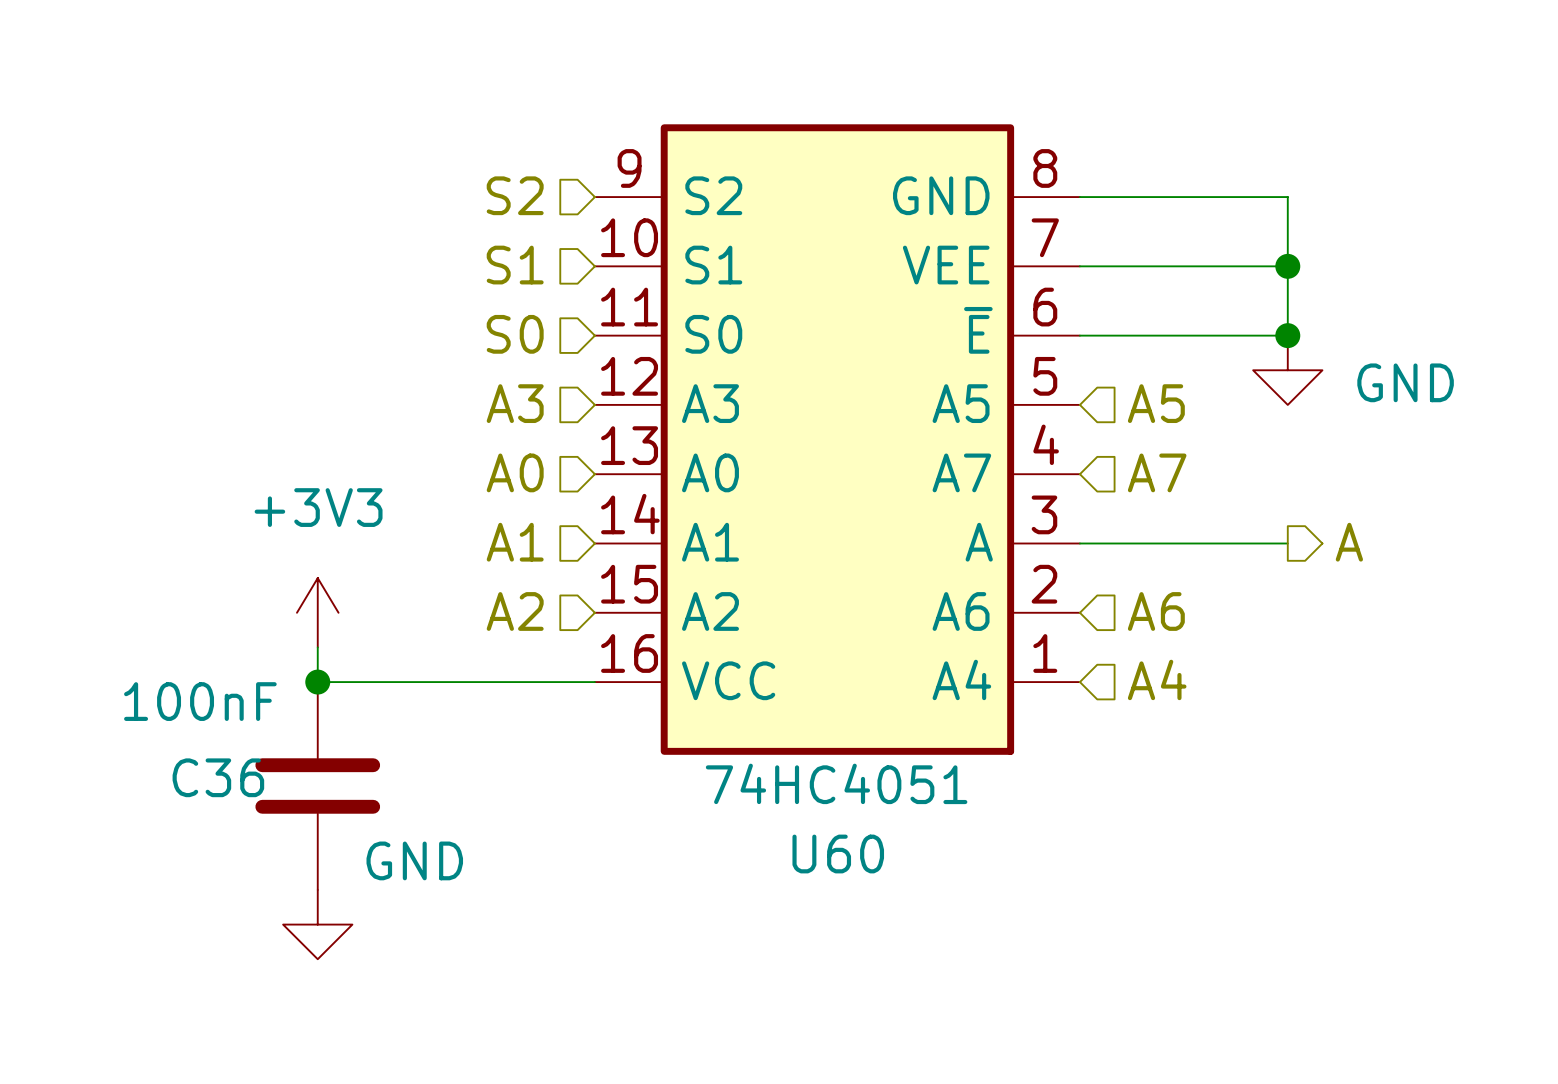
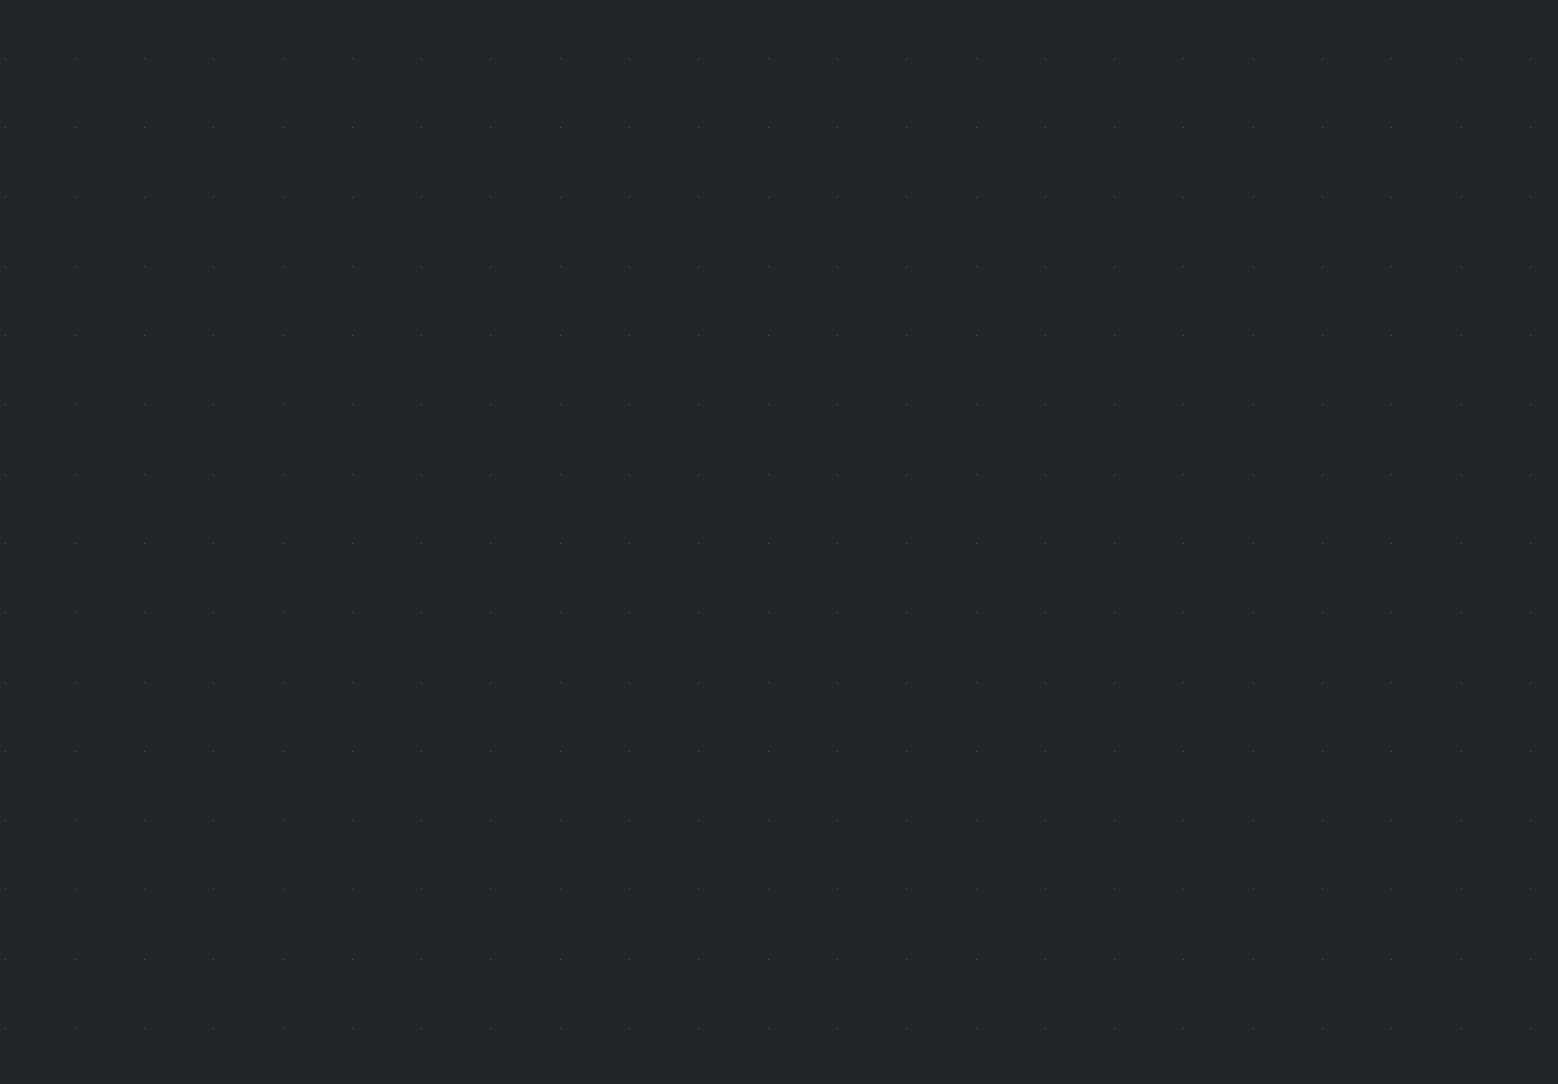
hierarchical label: S2 (515, 195) -> none
wire: (1079, 197) (1287, 197) (1287, 335) (1079, 335) -> none
hierarchical label: S1 (515, 265) -> none
wire: (1079, 266) (1287, 266) -> none
junction: (1287, 266) -> none
hierarchical label: S0 (515, 334) -> none
junction: (1287, 335) -> none
power symbol: GND (1287, 370) -> none
hierarchical label: A3 (515, 403) -> none
hierarchical label: A5 (1156, 403) -> none
U60: 74HC4051 (837, 439) -> none
hierarchical label: A0 (515, 472) -> none
hierarchical label: A7 (1157, 472) -> none
hierarchical label: A1 (515, 542) -> none
hierarchical label: A (1349, 542) -> none
wire: (1079, 543) (1287, 543) -> none
hierarchical label: A2 (515, 611) -> none
hierarchical label: A6 (1156, 611) -> none
power symbol: +3V3 (317, 612) -> none
wire: (317, 647) (317, 682) (594, 682) -> none
hierarchical label: A4 (1157, 679) -> none
junction: (317, 682) -> none
C36: 100nF (317, 786) -> none
power symbol: GND (317, 924) -> none

